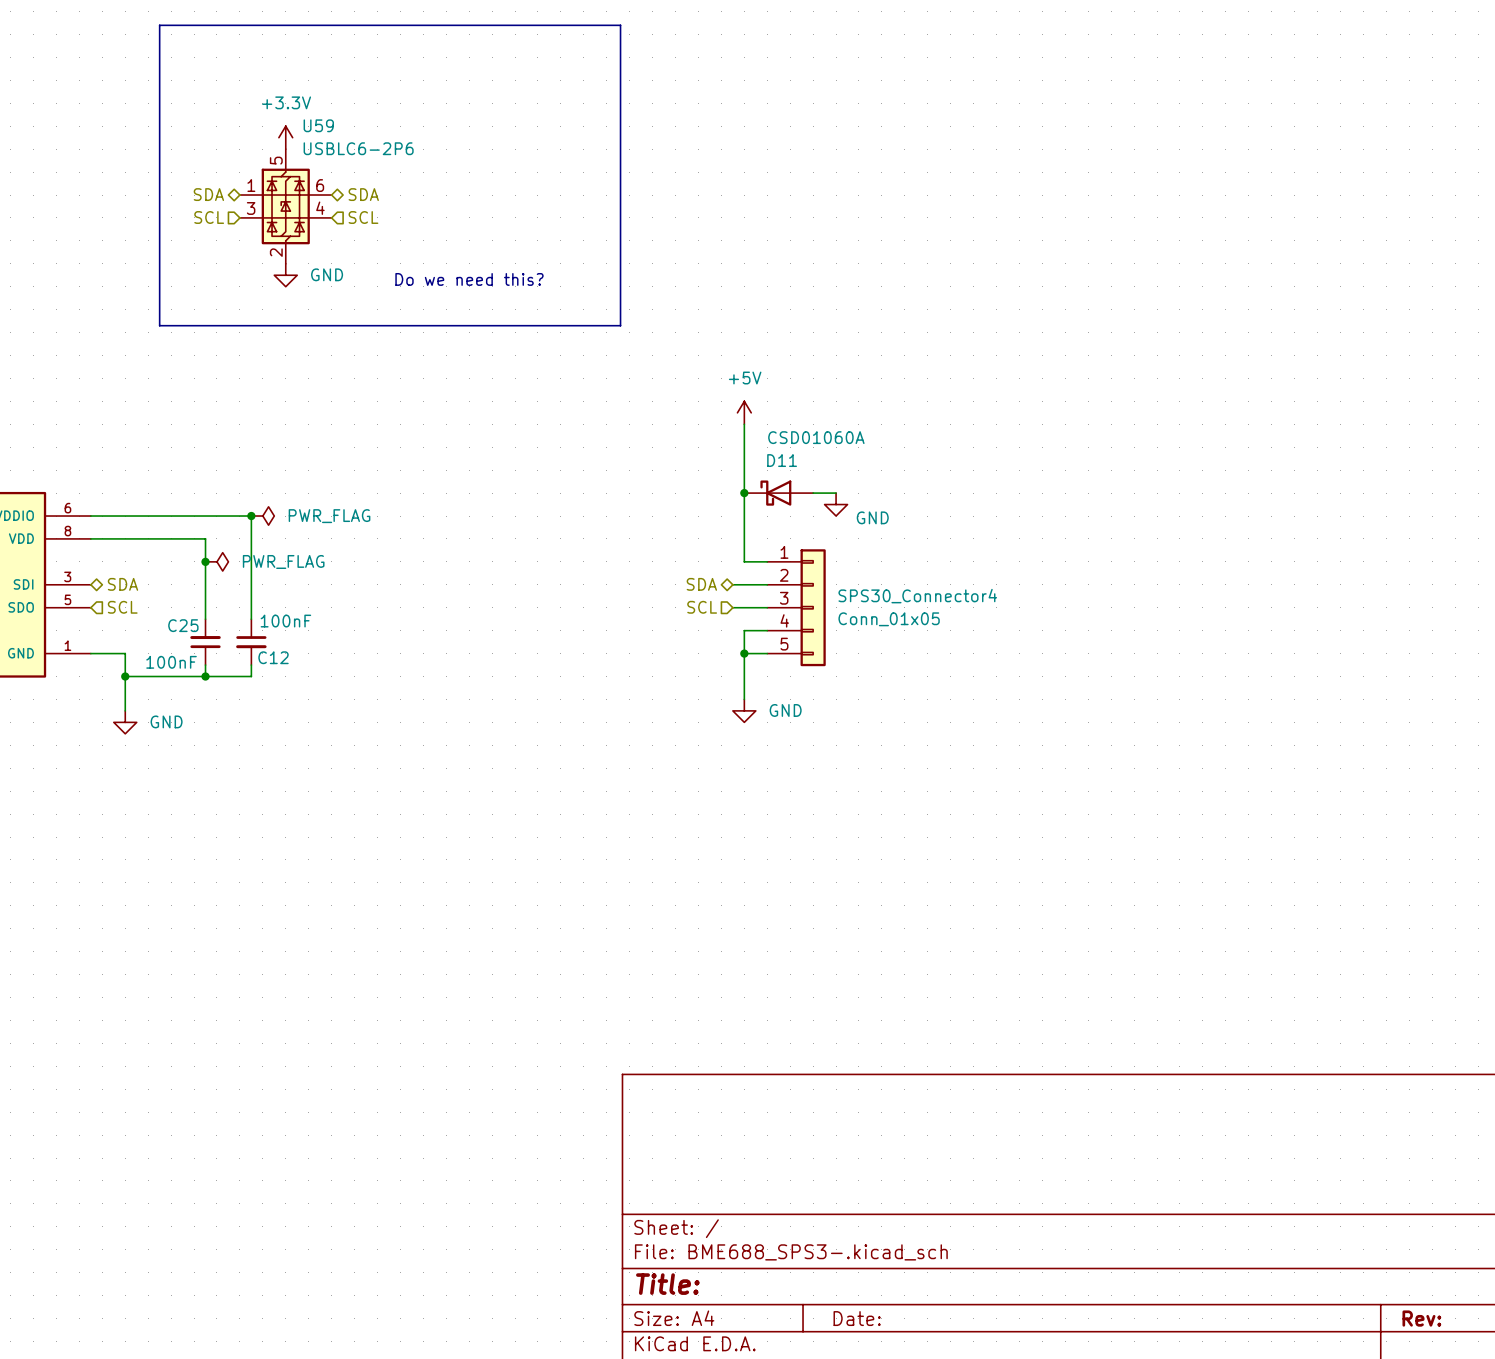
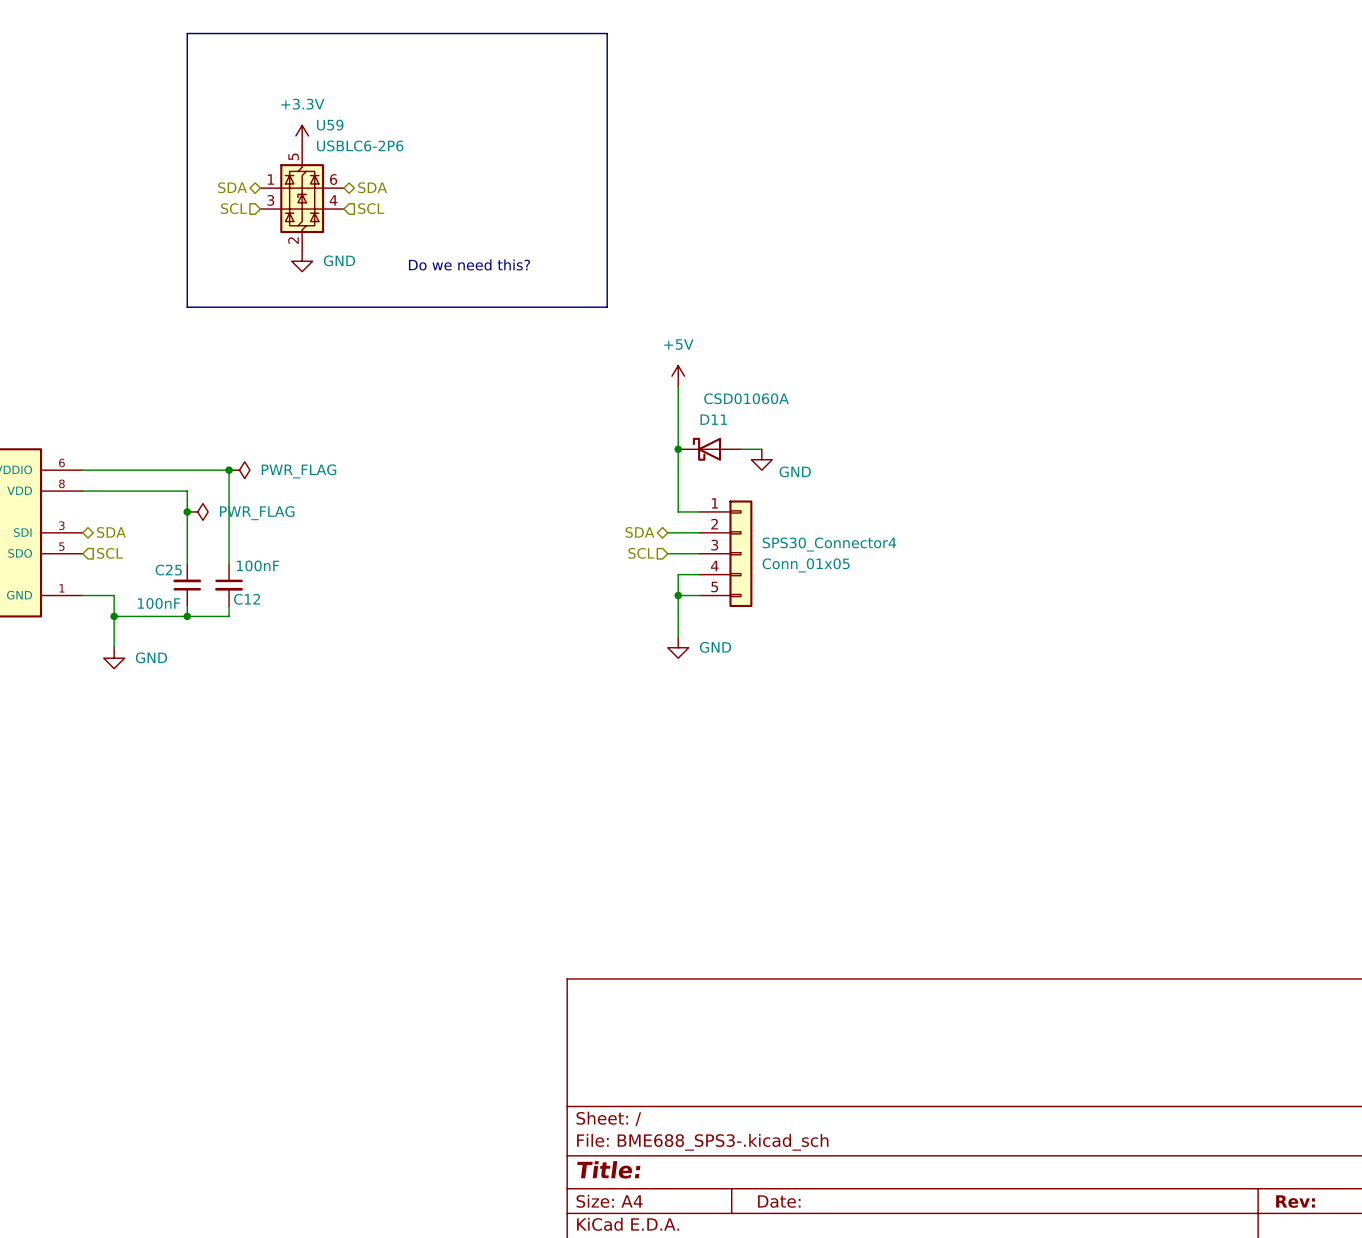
line: (159, 25) (620, 25) (620, 325) (159, 325) (159, 25) -> (187, 33) (607, 33) (607, 307) (187, 307) (187, 33)
power symbol position: +3.3V (285, 137) -> +3.3V (302, 135)
hierarchical label: SDA (208, 194) -> none
hierarchical label: SDA (363, 194) -> none
hierarchical label: none -> SDA (232, 187)
U59 position: (285, 206) -> (302, 198)
hierarchical label: none -> SDA (372, 187)
hierarchical label: SCL (209, 217) -> none
hierarchical label: SCL (363, 217) -> none
hierarchical label: none -> SCL (234, 208)
hierarchical label: none -> SCL (371, 208)
power symbol position: GND (285, 275) -> GND (302, 261)
text position: Do we need this? (469, 279) -> Do we need this? (469, 264)

